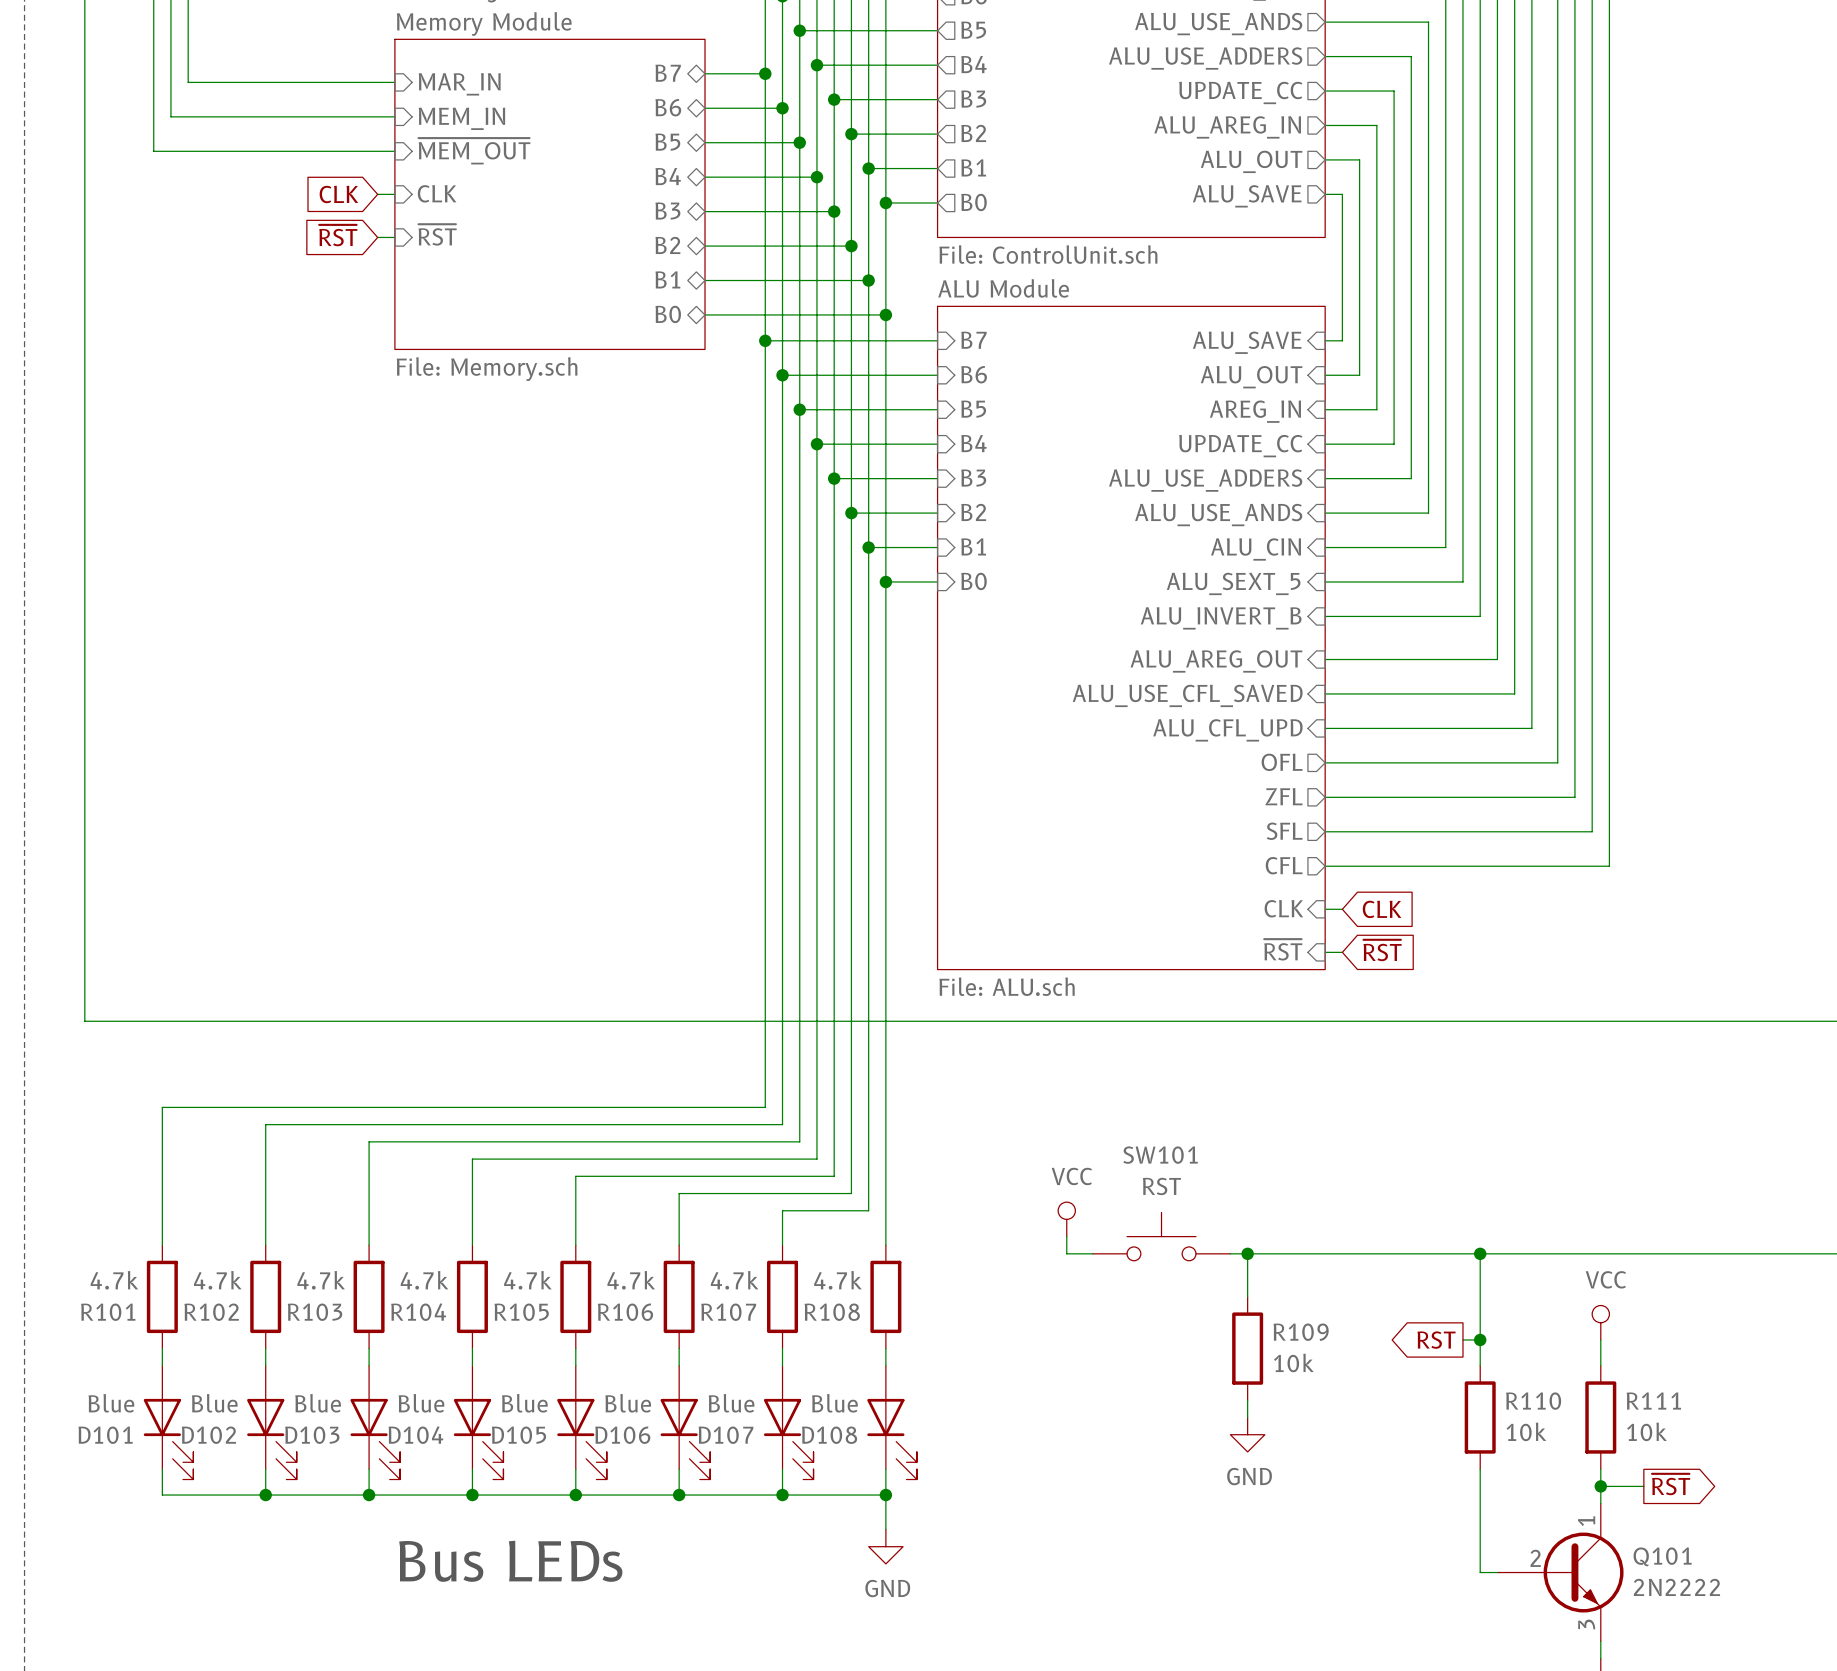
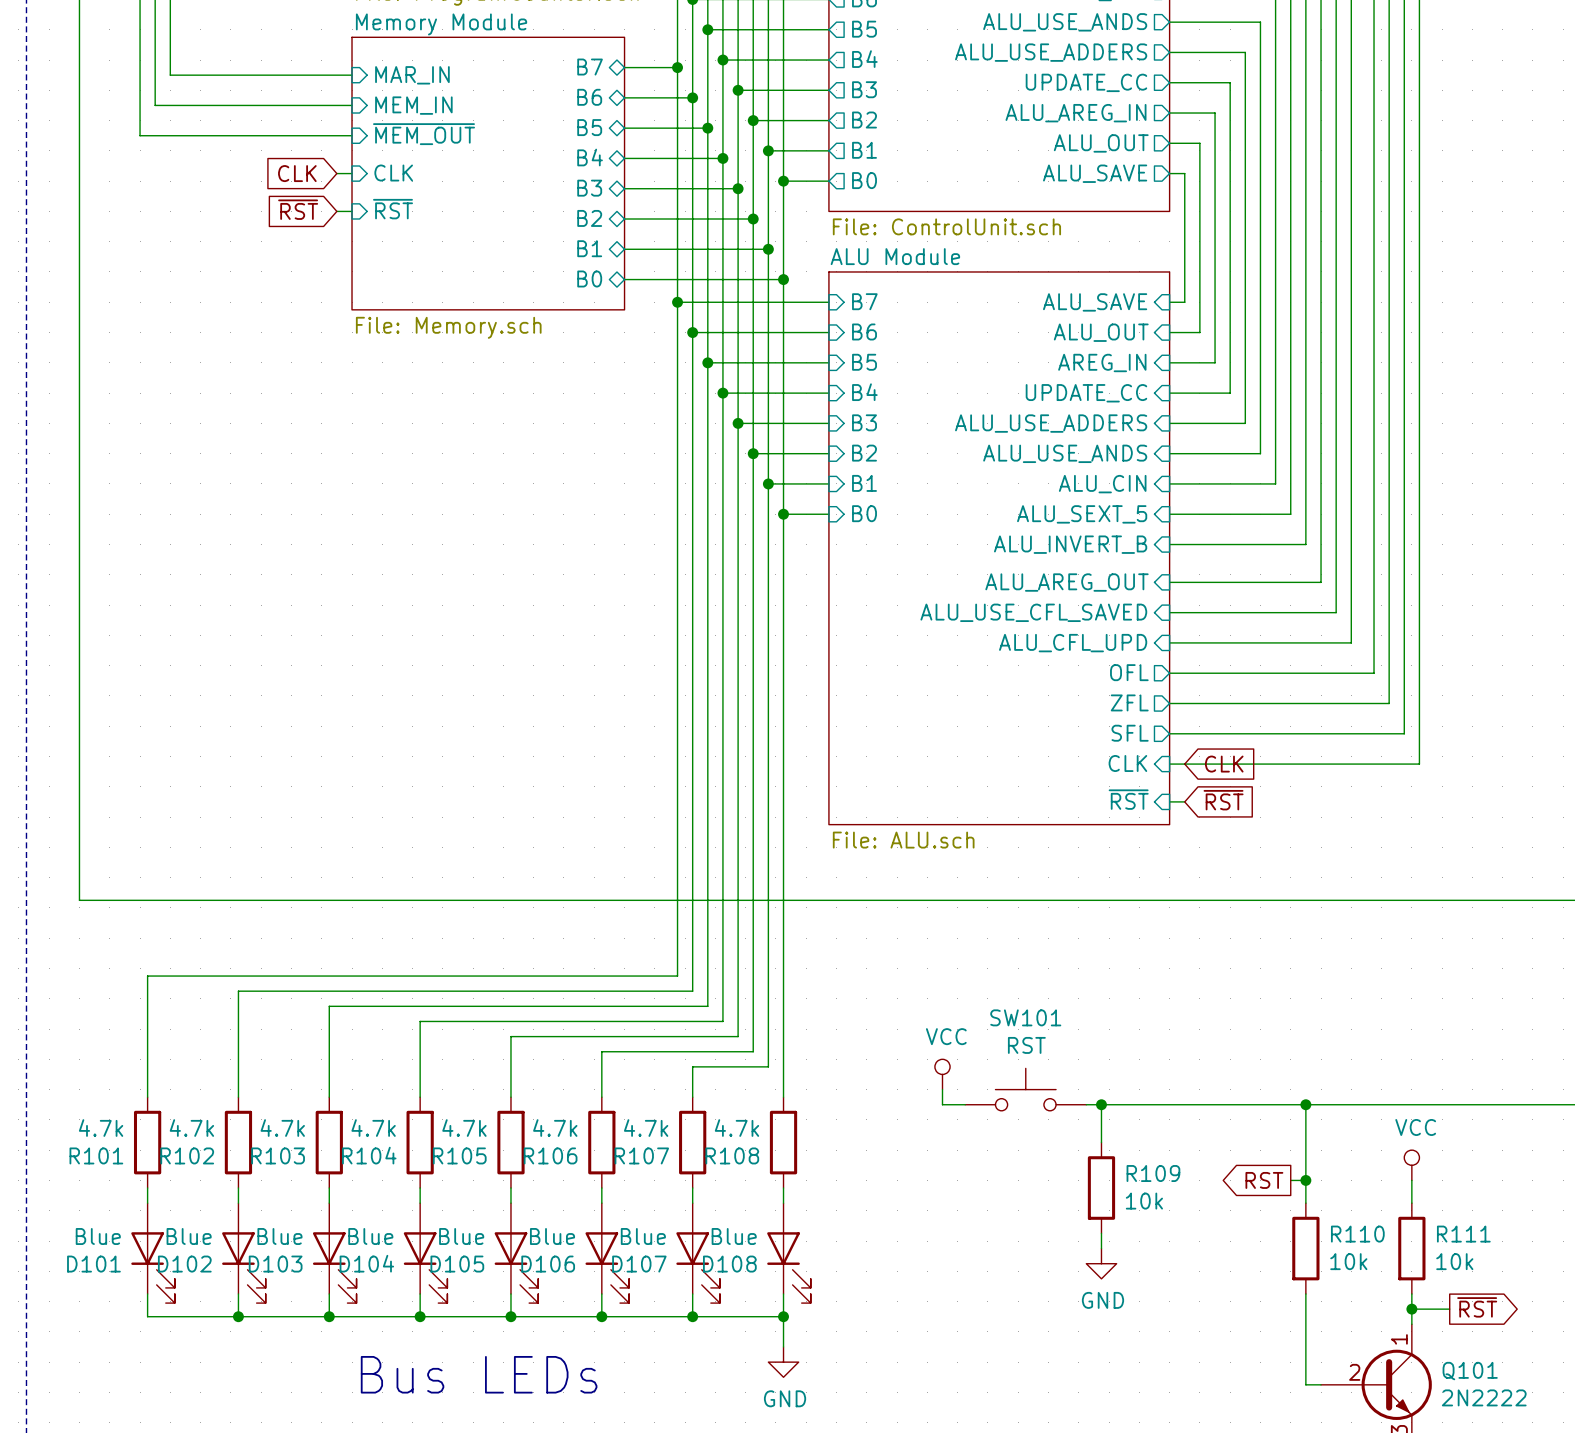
sheet ALU Module: none -> File: ALU.sch (999, 548)
sheet ALU Module: File: ALU.sch (1131, 637) -> none
sheet pin shape: output (1284, 865) -> input (1127, 763)
sheet pin: CFL (1284, 865) -> CLK (1127, 763)
global label: none -> CLK (1224, 764)
sheet pin: CLK (1283, 908) -> ~{RST} (1128, 799)
global label: CLK (1382, 909) -> ~{RST} (1223, 800)
sheet pin: ~{RST} (1283, 949) -> none
global label: ~{RST} (1382, 950) -> none
wire: (1325, 952) (1342, 952) -> none

